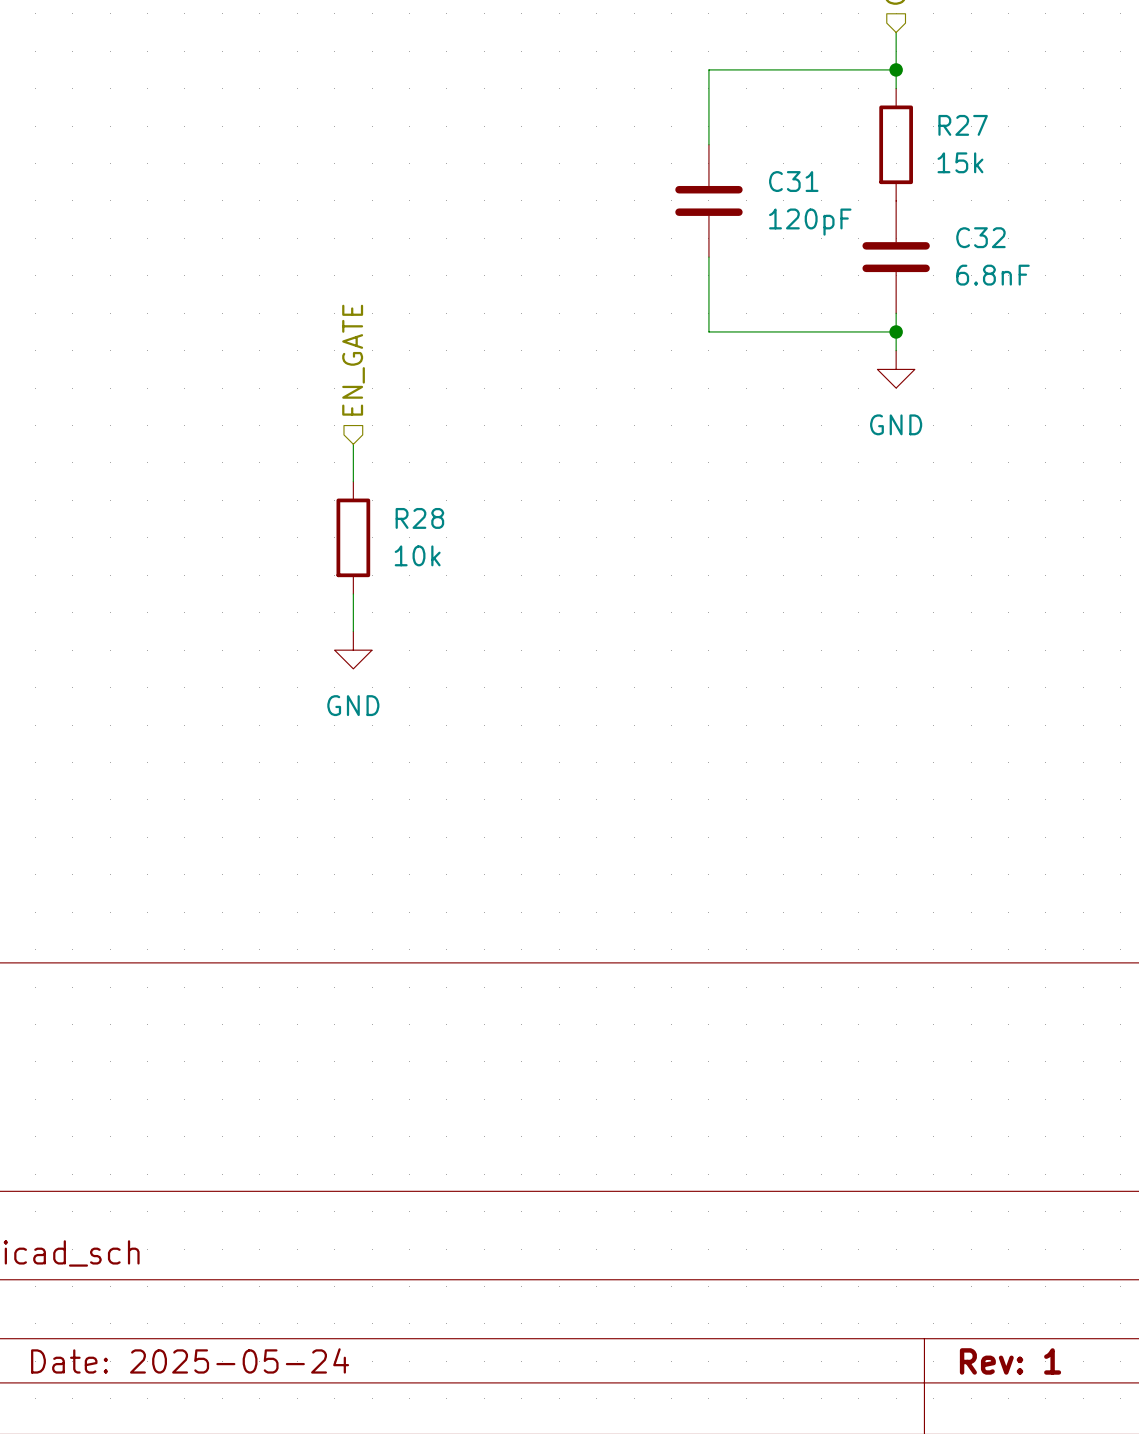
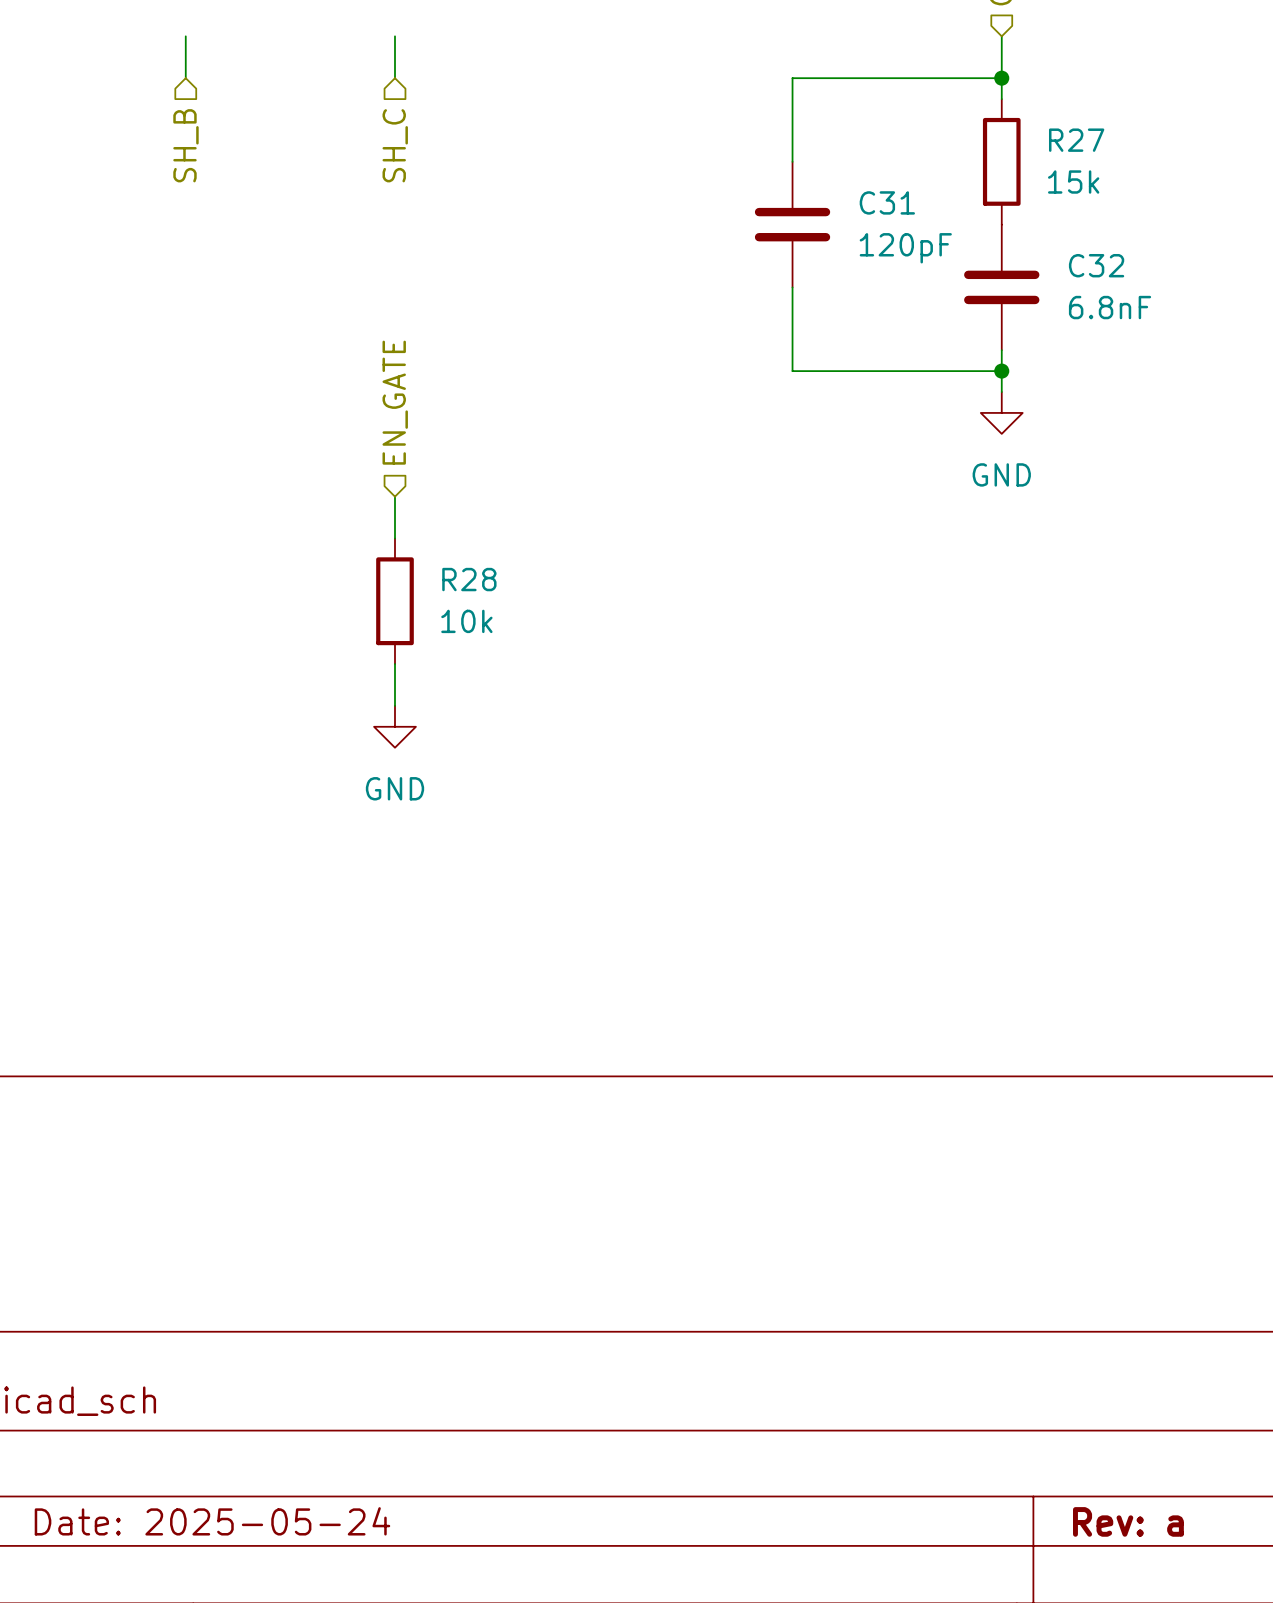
wire: none -> (185, 36) (185, 78)
wire: none -> (394, 36) (394, 78)
hierarchical label: none -> SH_B (185, 145)
hierarchical label: none -> SH_C (395, 145)
title block: Rev: 1 (1010, 1361) -> Rev: a (1128, 1521)

